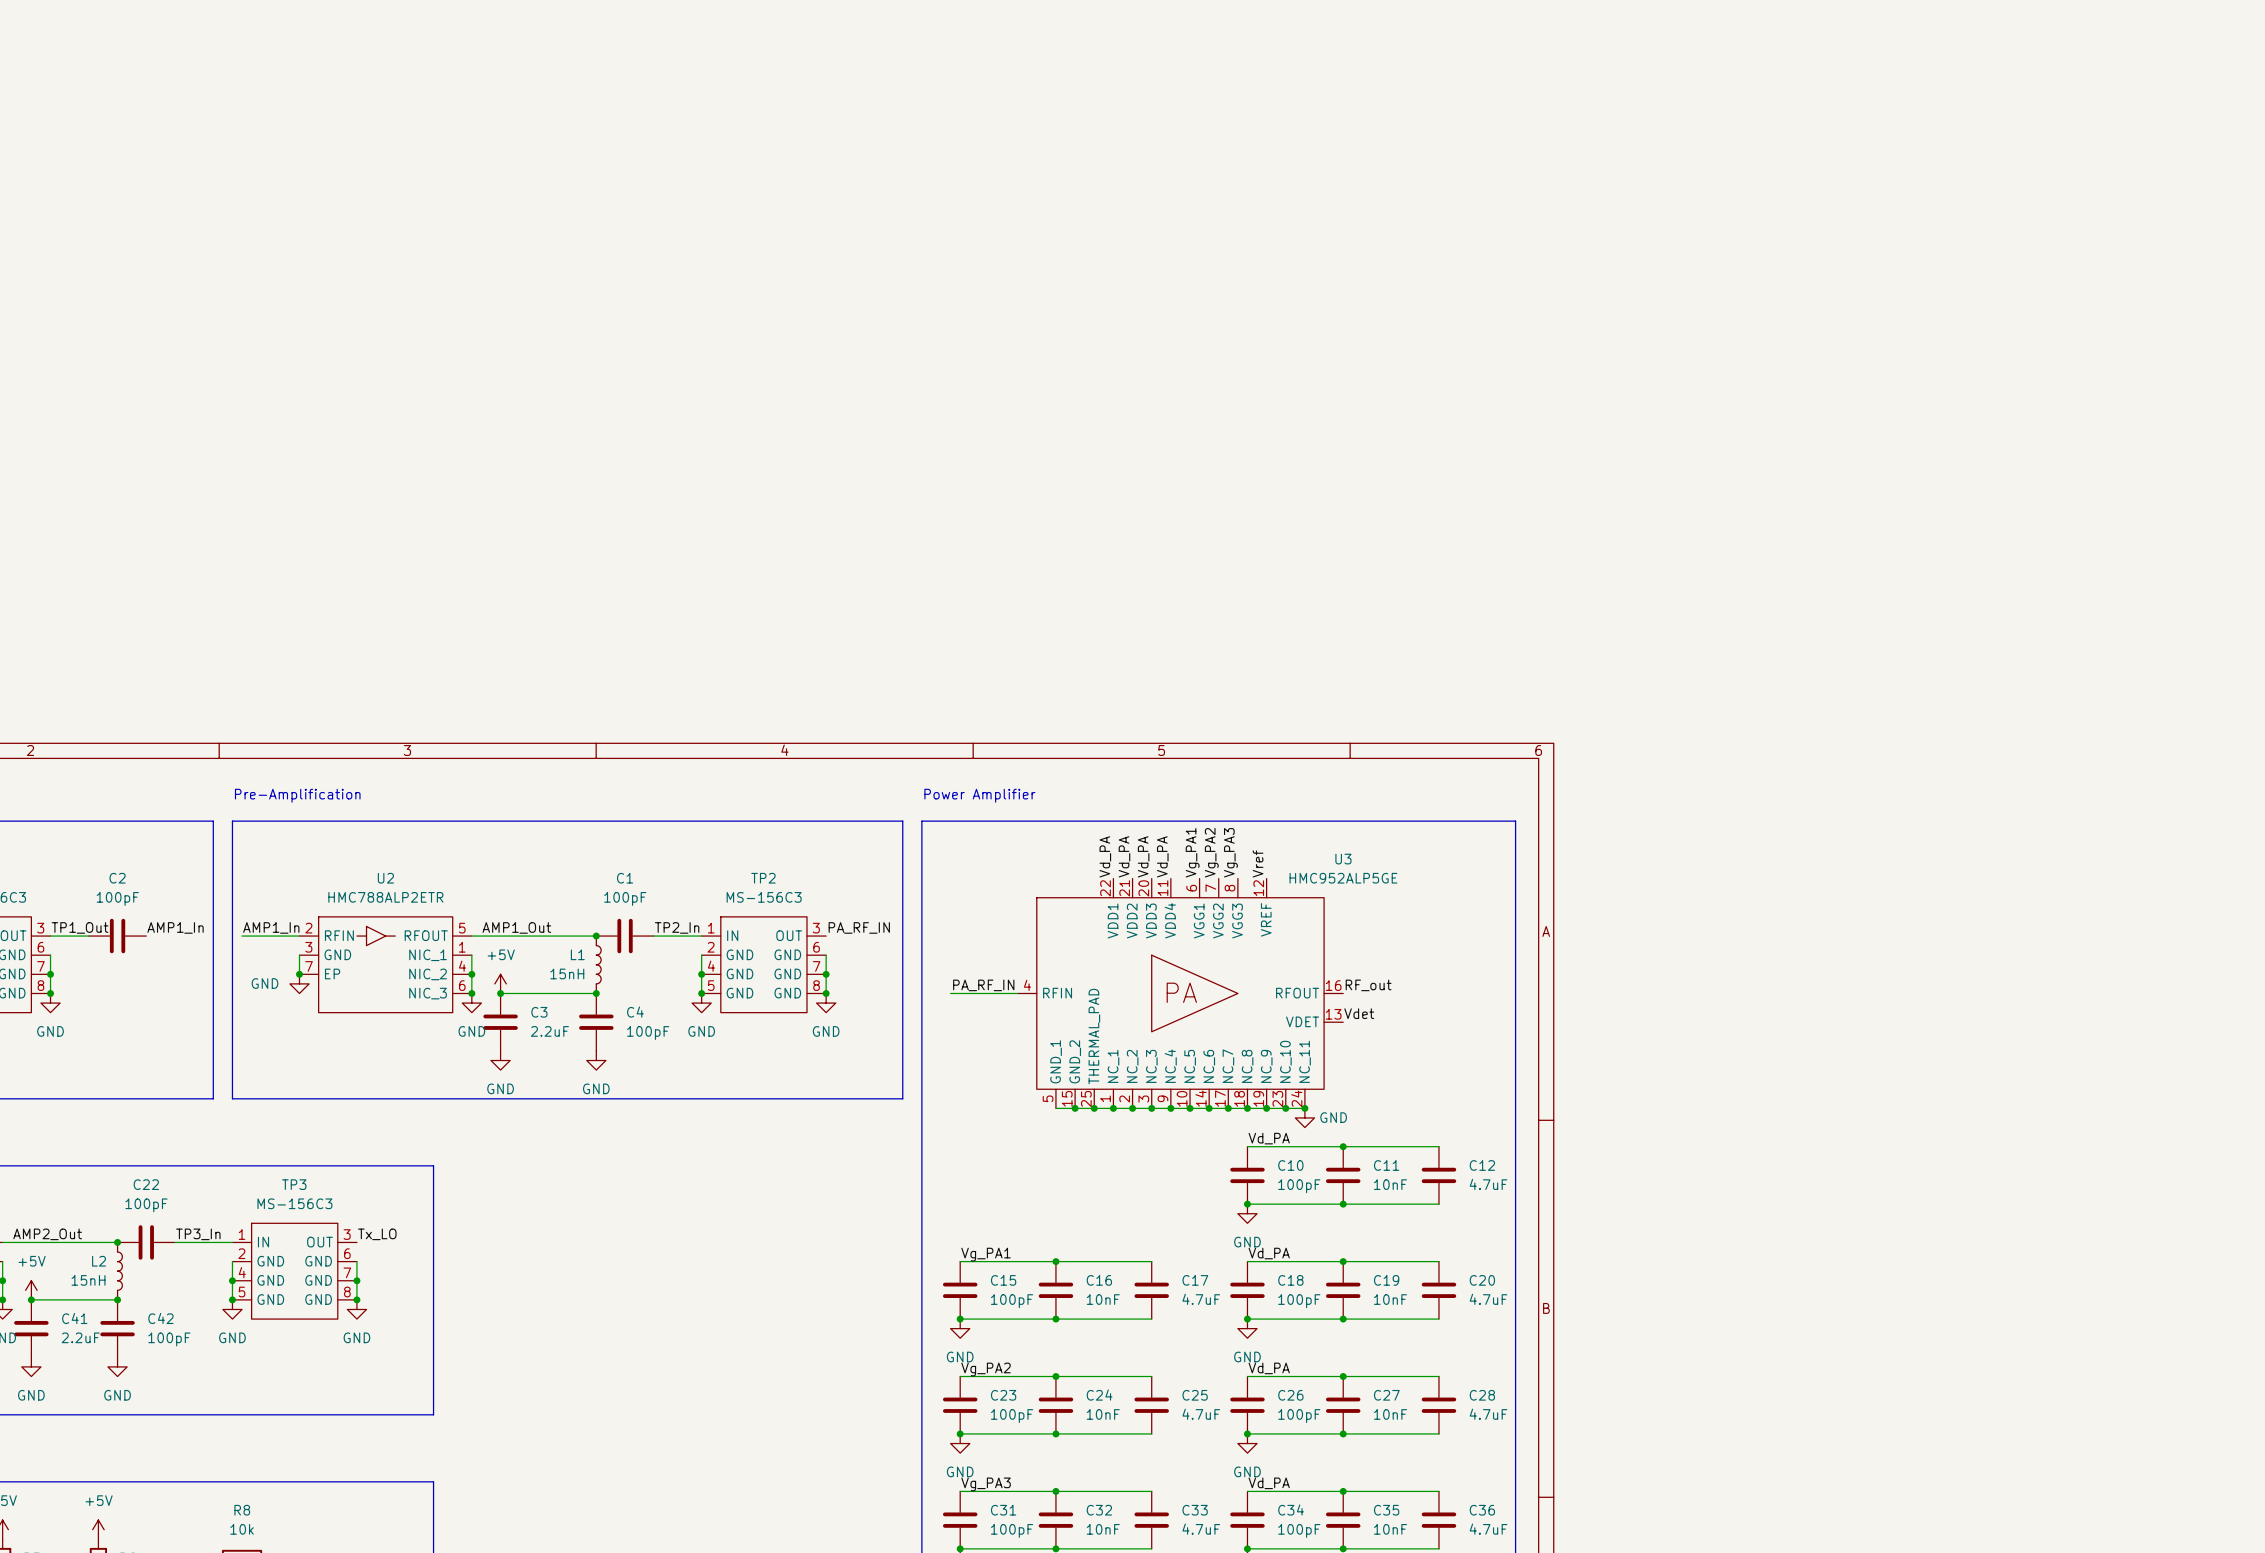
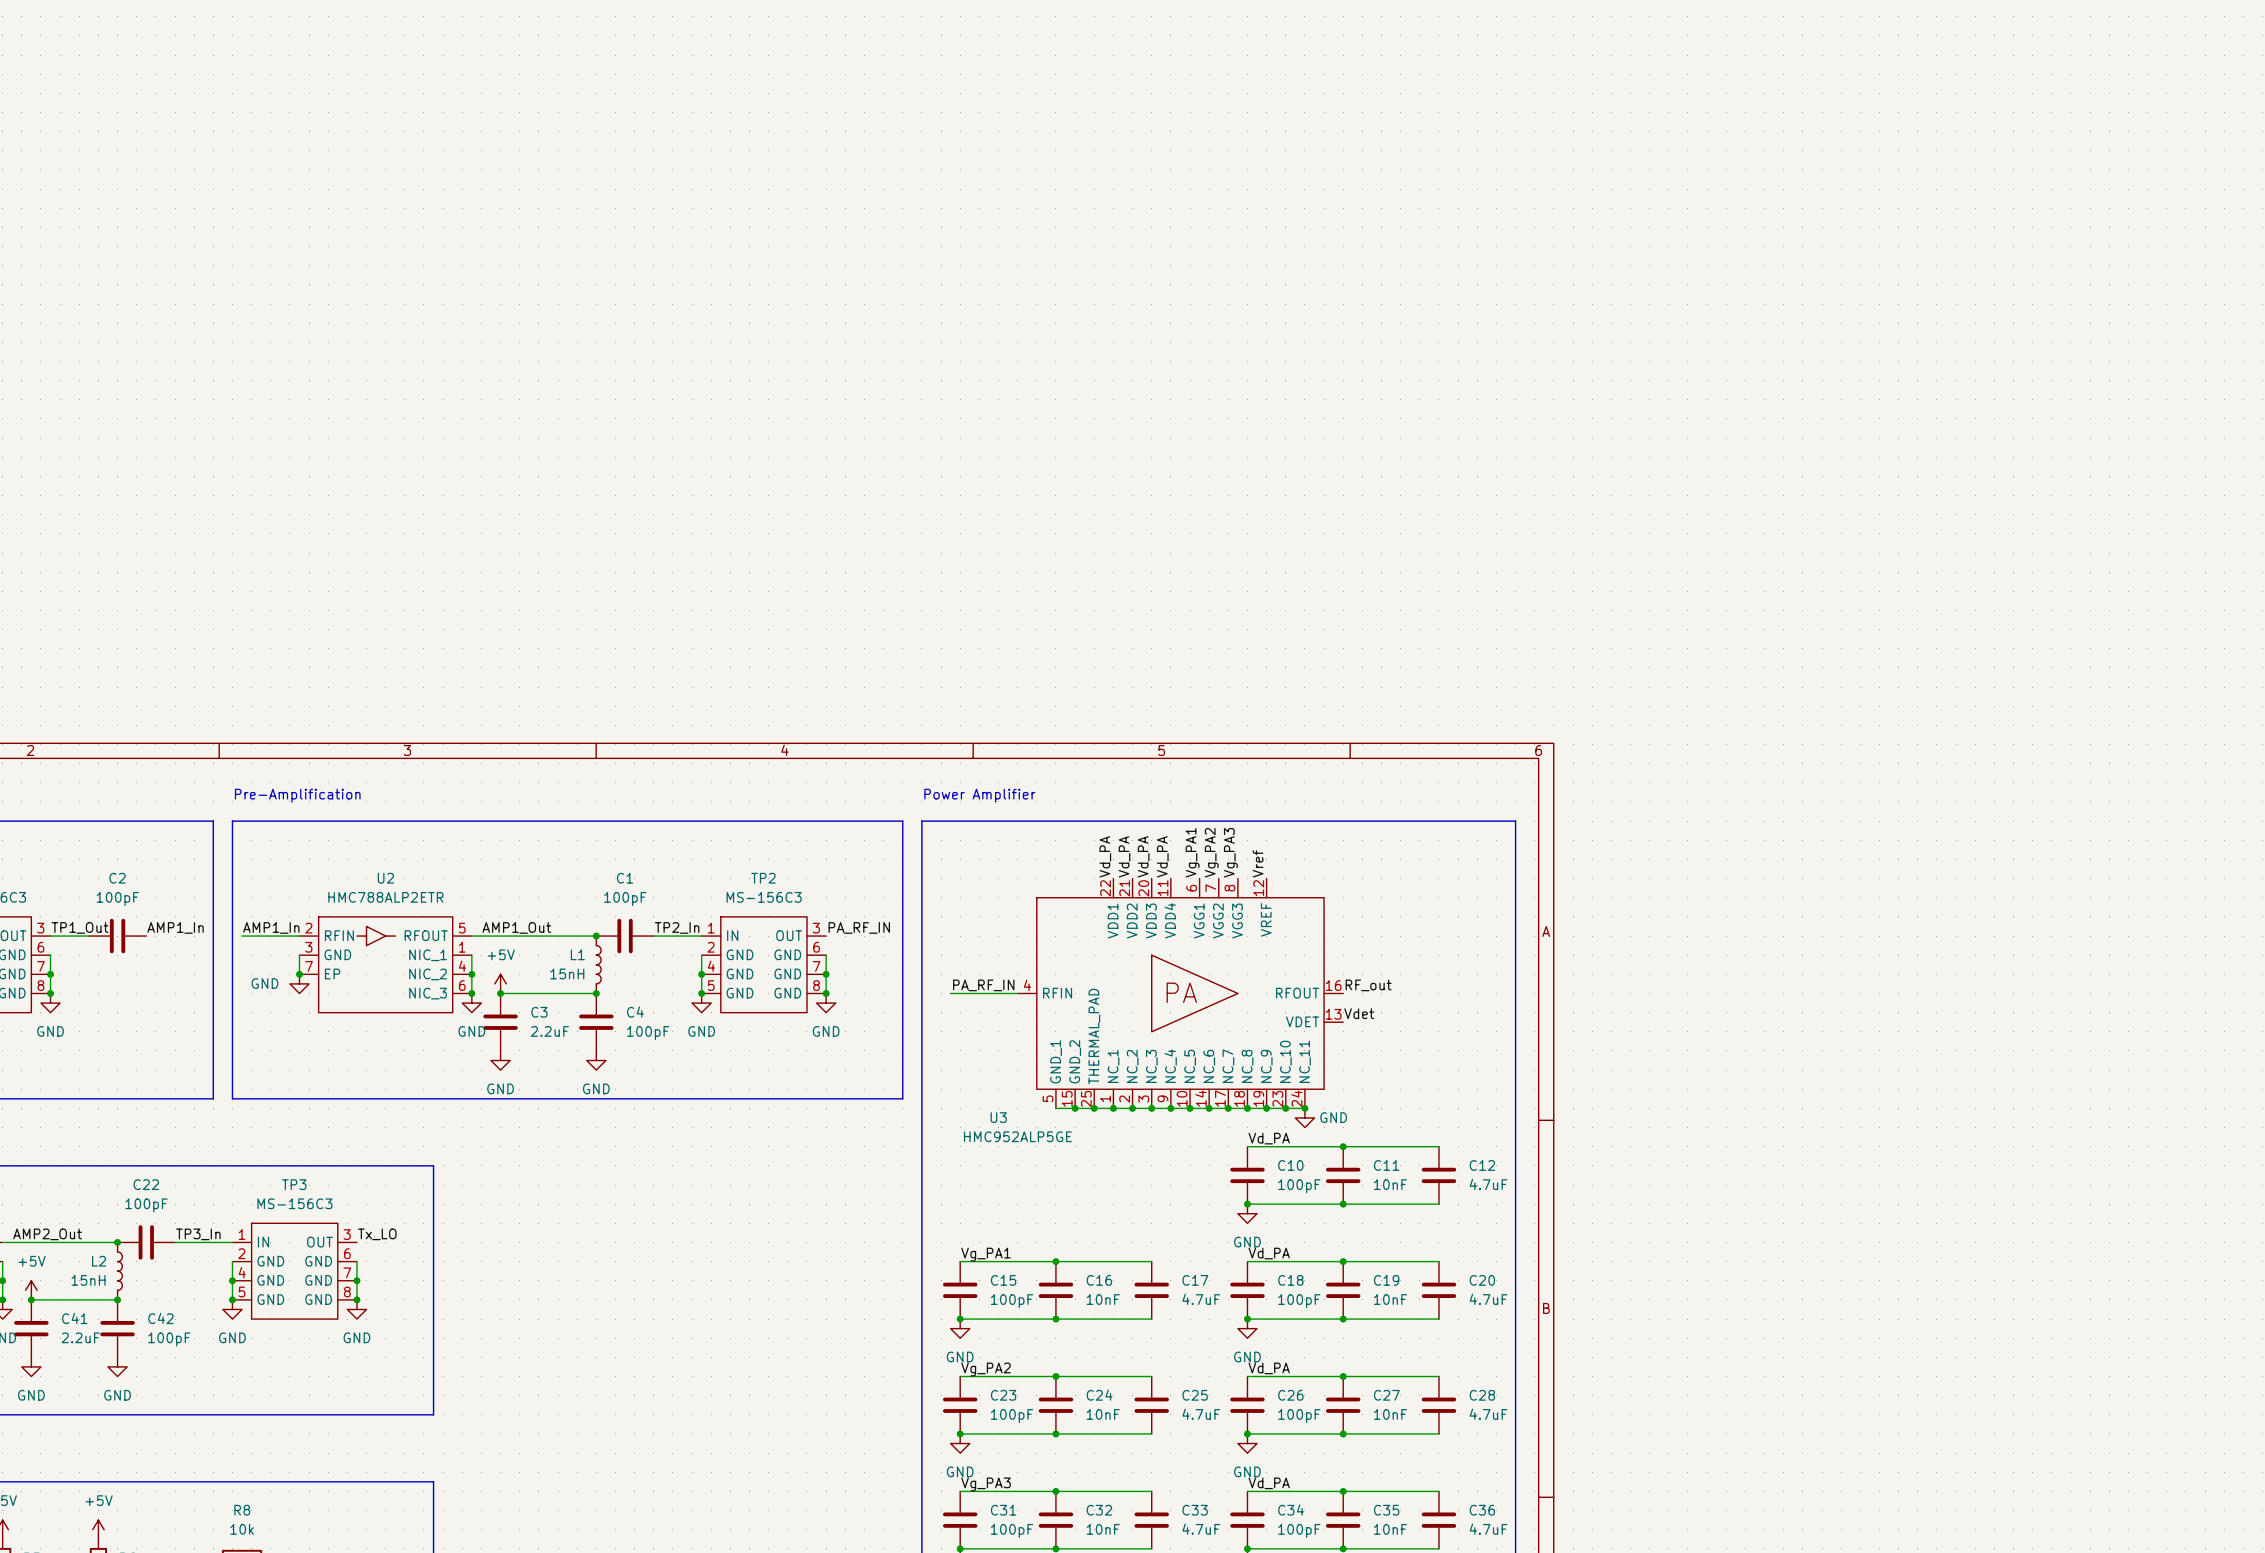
U3 name position: U3 (1343, 859) -> U3 (998, 1117)
U3 value position: HMC952ALP5GE (1343, 878) -> HMC952ALP5GE (1017, 1136)

